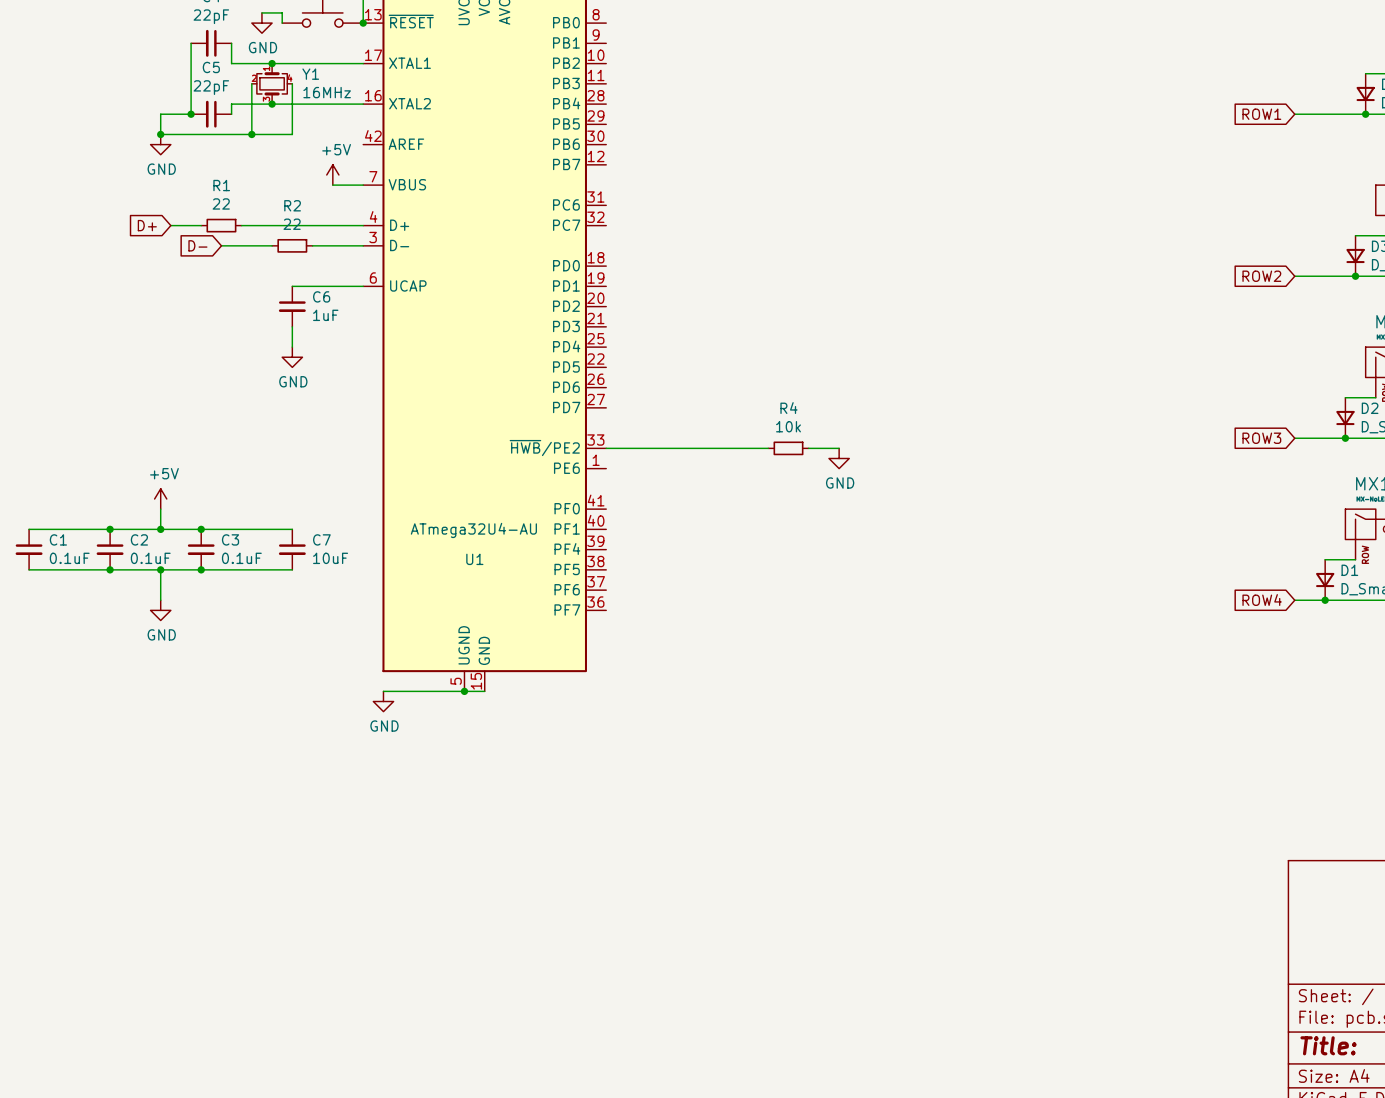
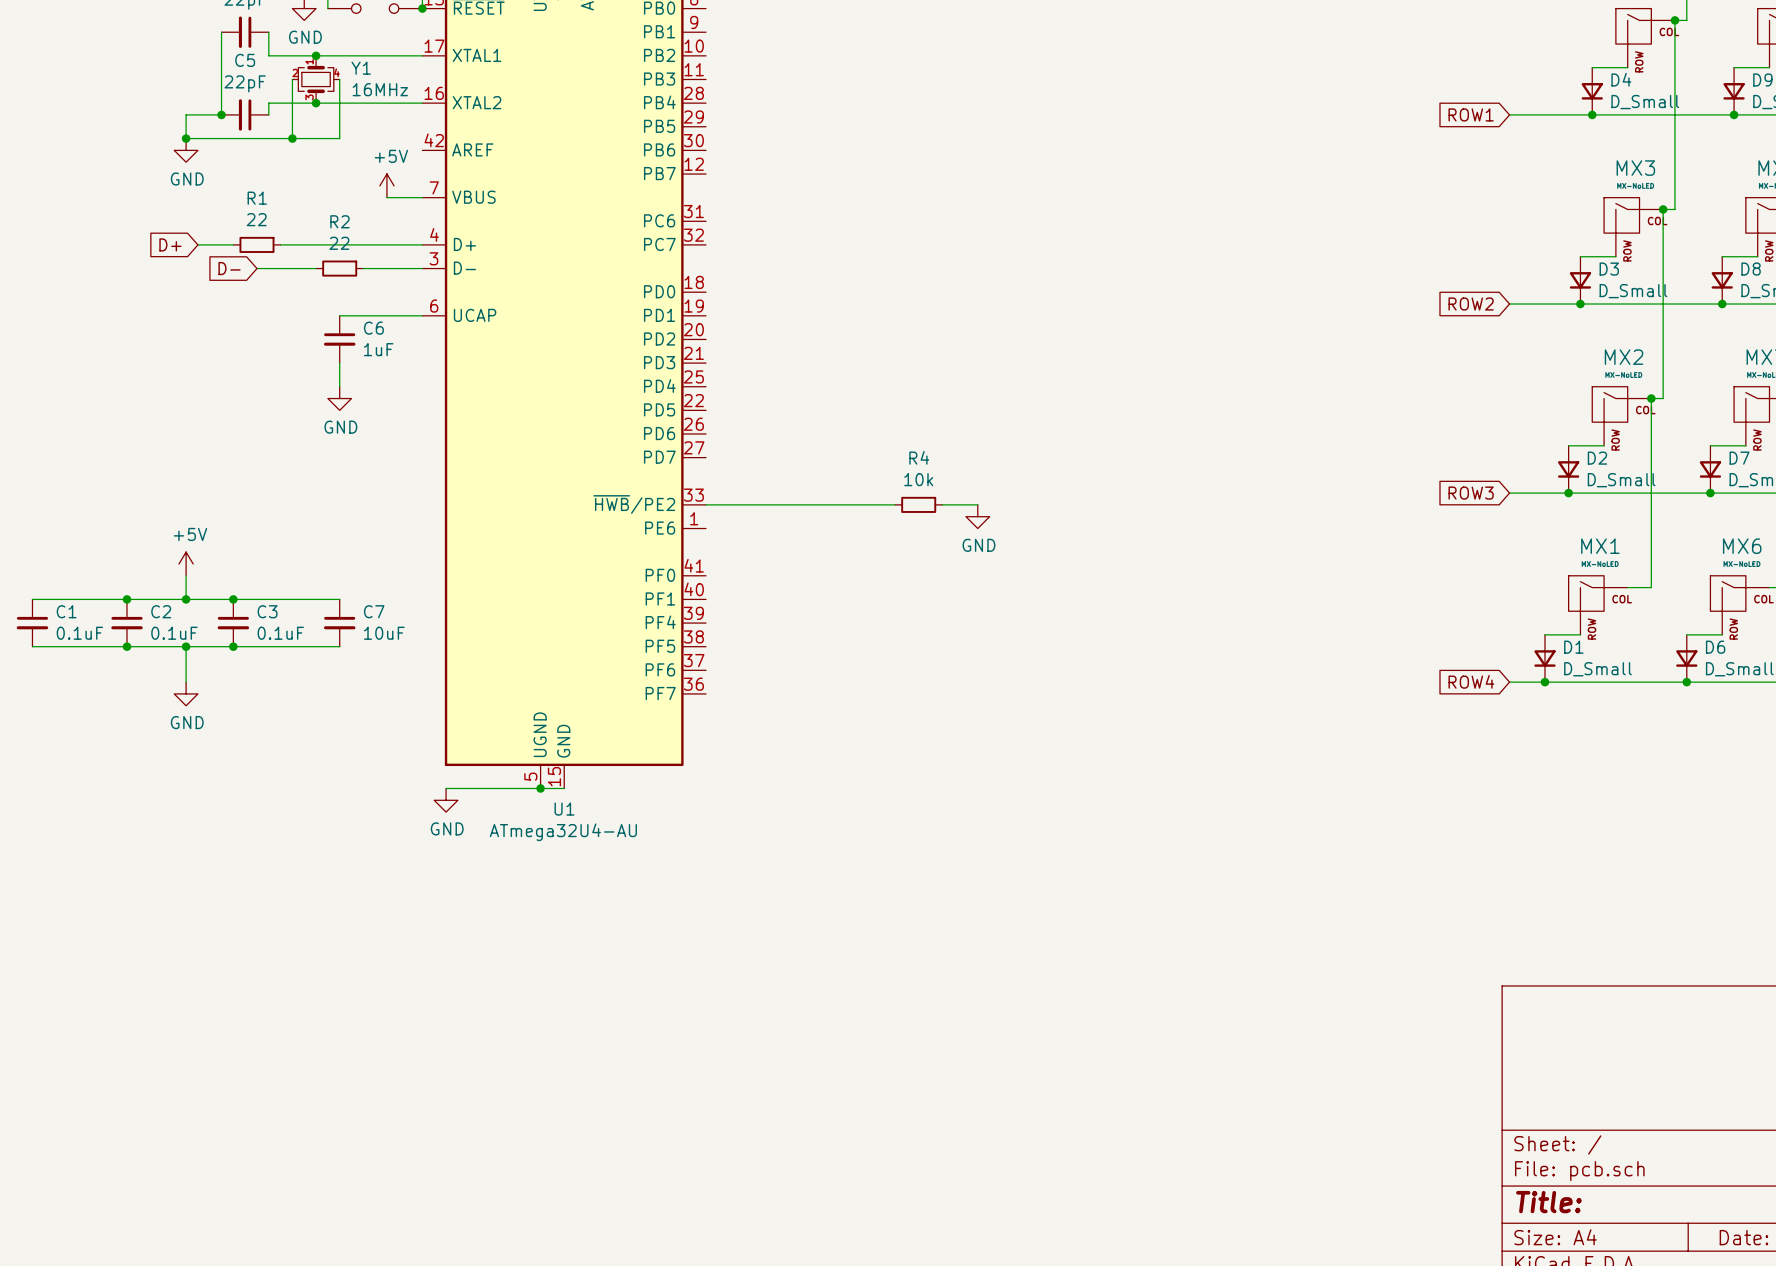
U1 value position: ATmega32U4-AU (473, 530) -> ATmega32U4-AU (563, 832)
U1 name position: U1 (474, 559) -> U1 (564, 809)

